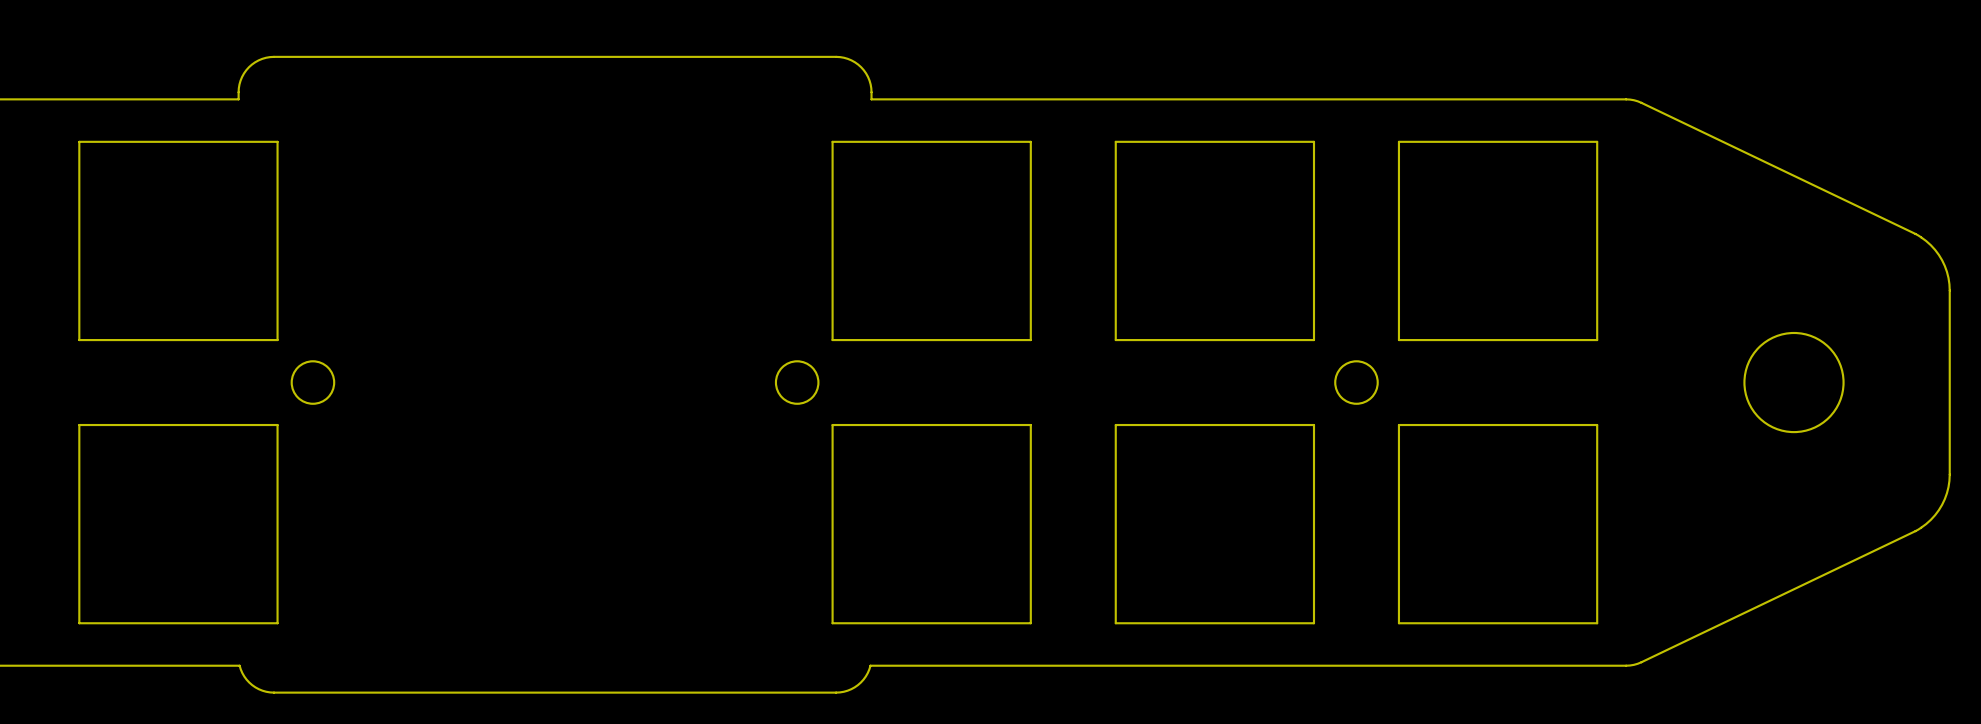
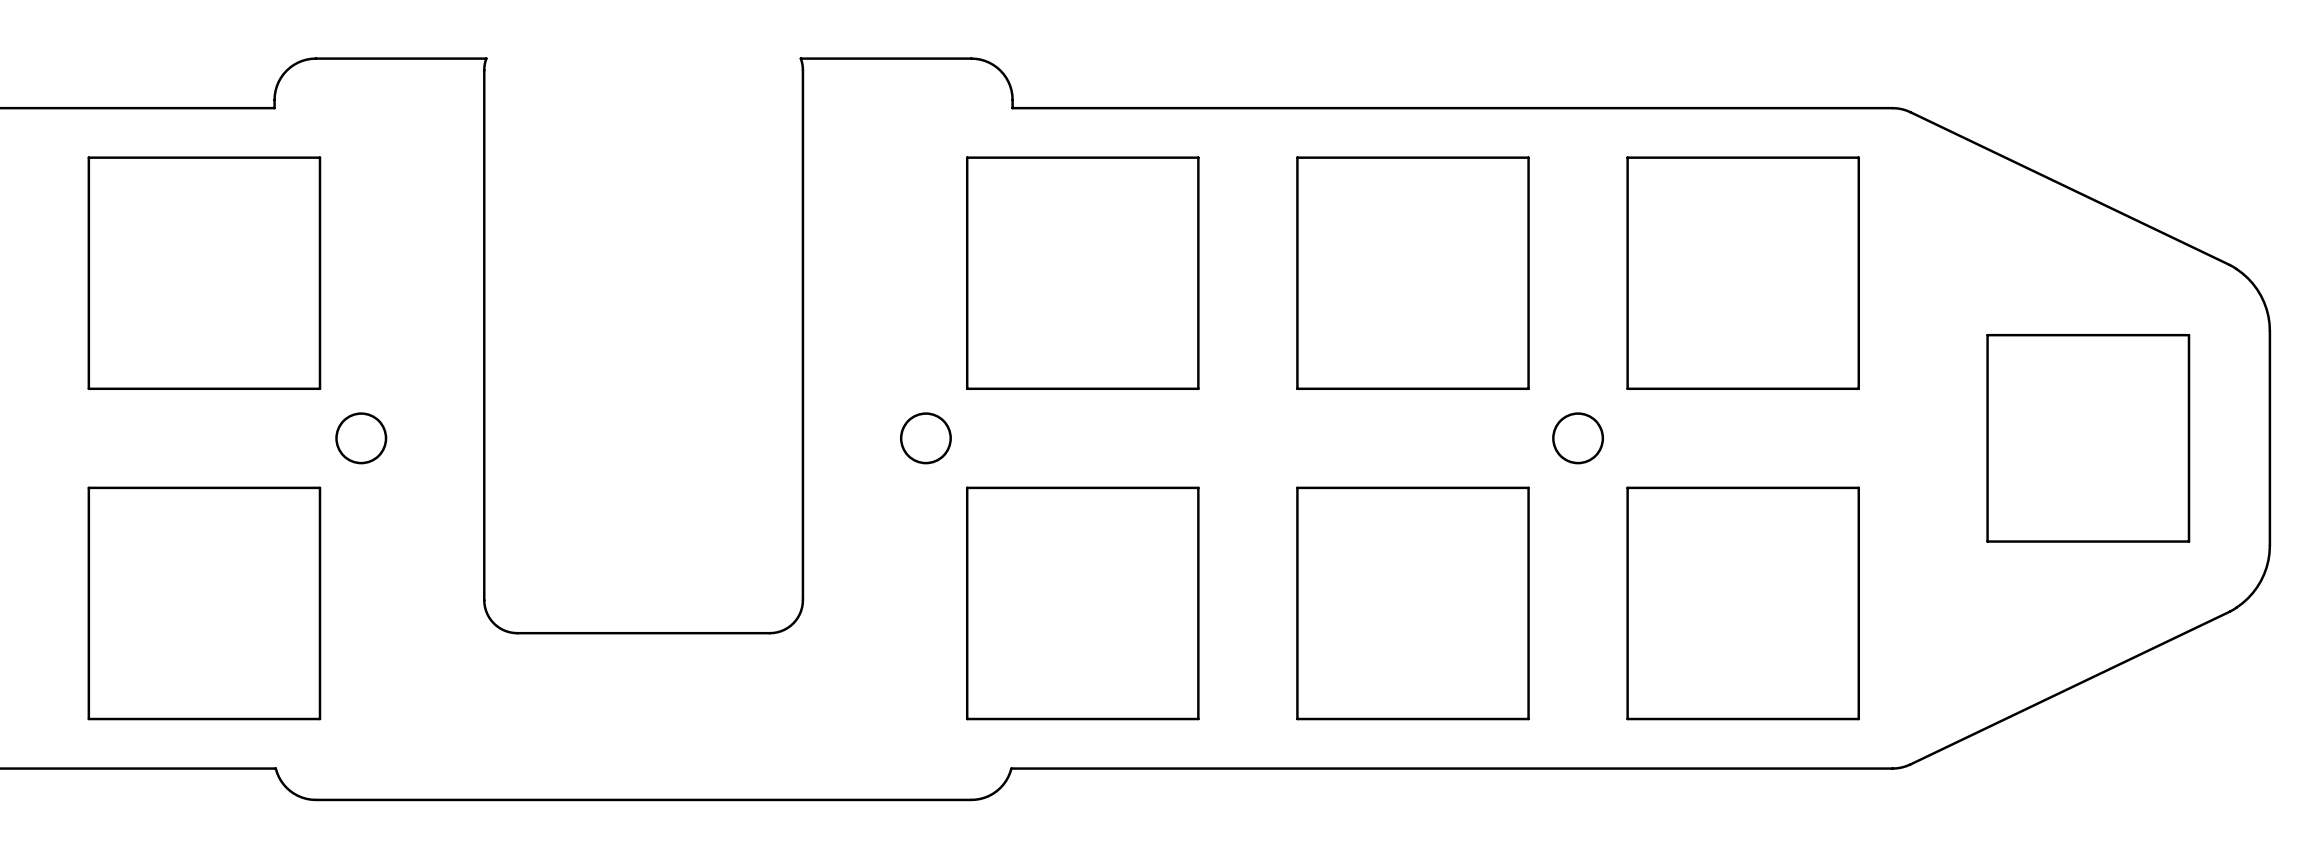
board edge: (689, 56) (420, 56) -> (800, 58) (802, 70) (802, 600) (799, 614) (793, 623) (780, 631) (769, 633) (513, 632) (499, 628) (487, 614) (484, 600) (484, 70) (486, 58)
board edge: none -> (2188, 335) (1987, 335) (1987, 541) (2188, 541) (2188, 335)
round board edge: [1743, 331, 1845, 434] -> none

